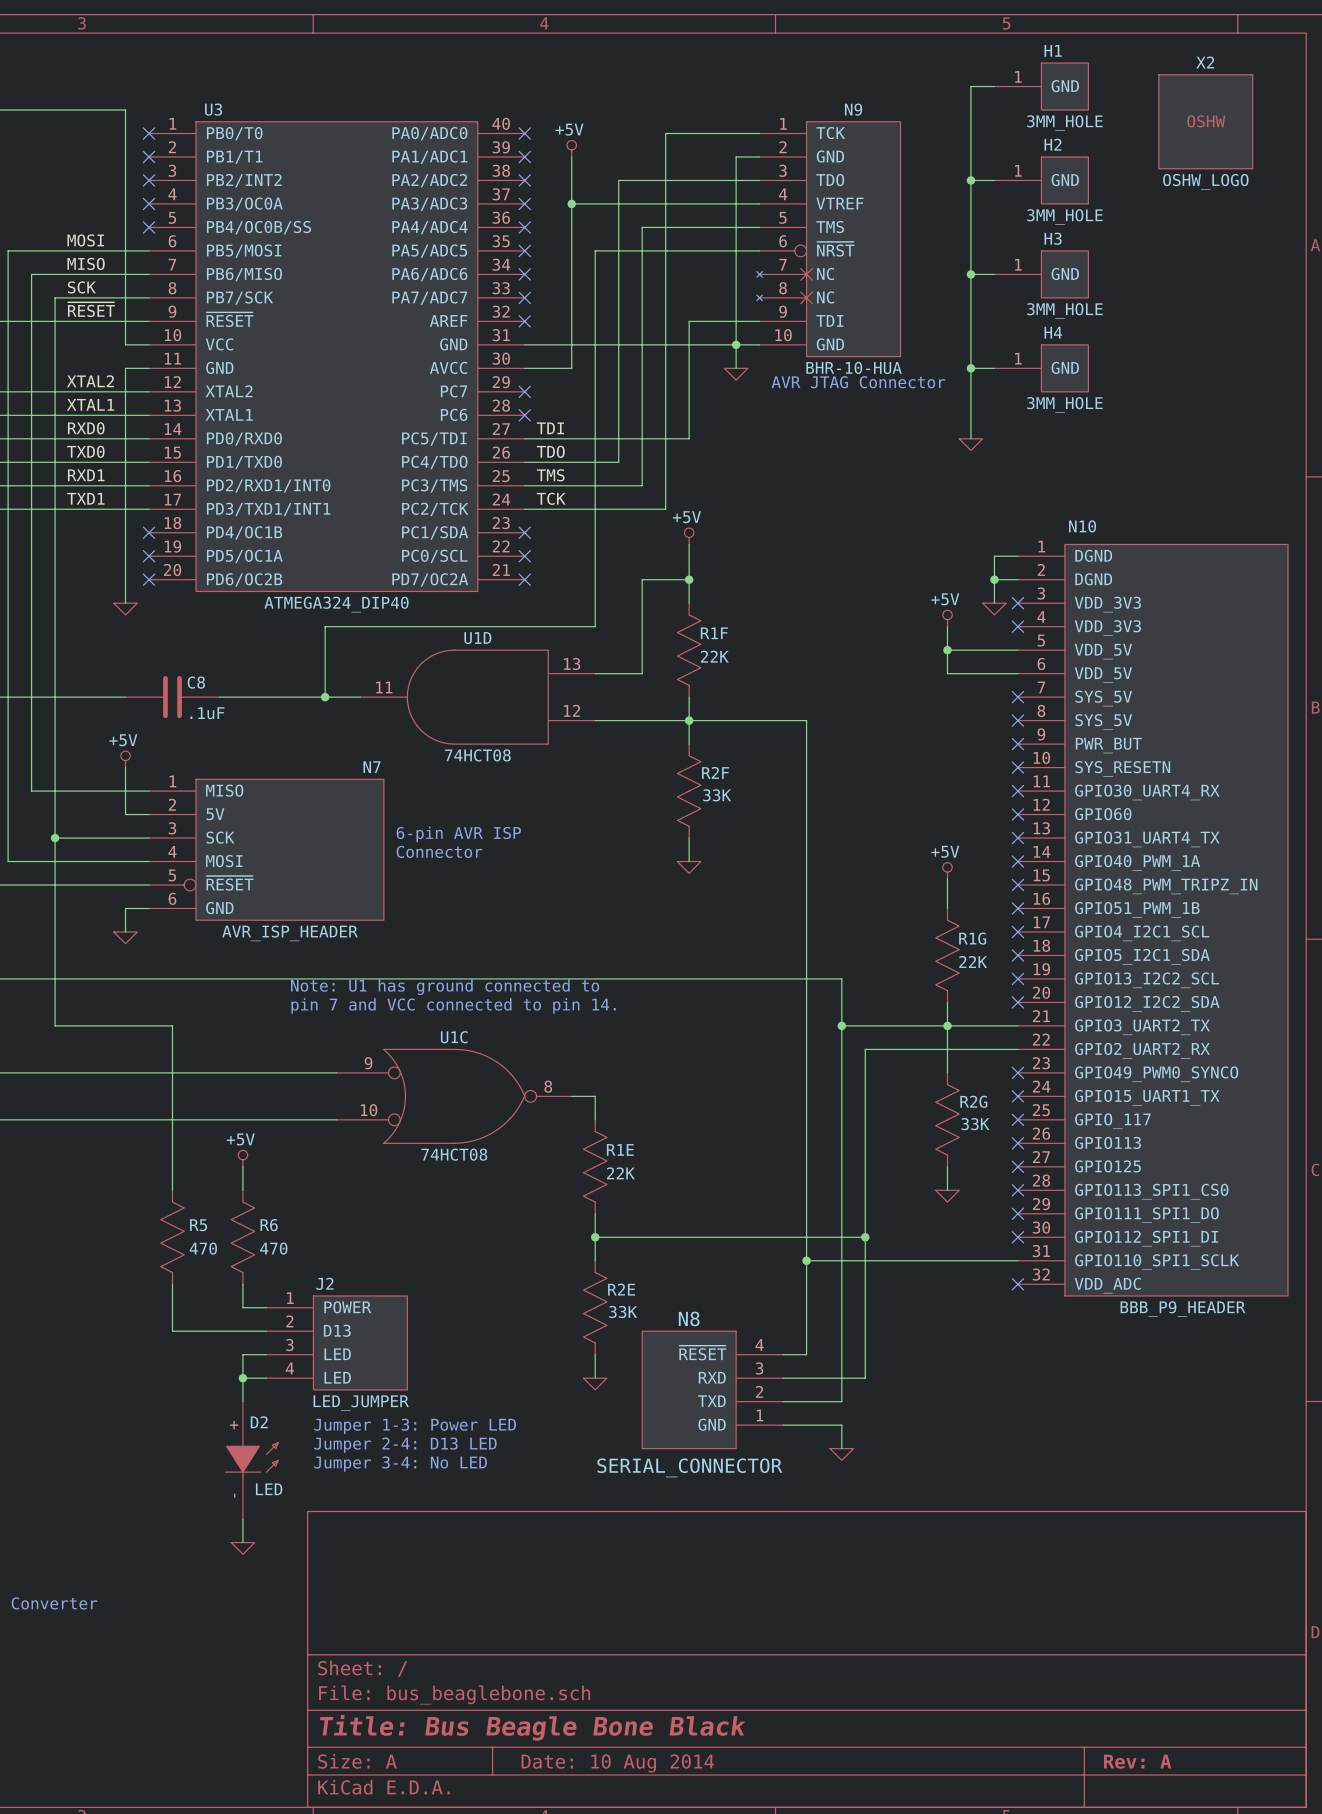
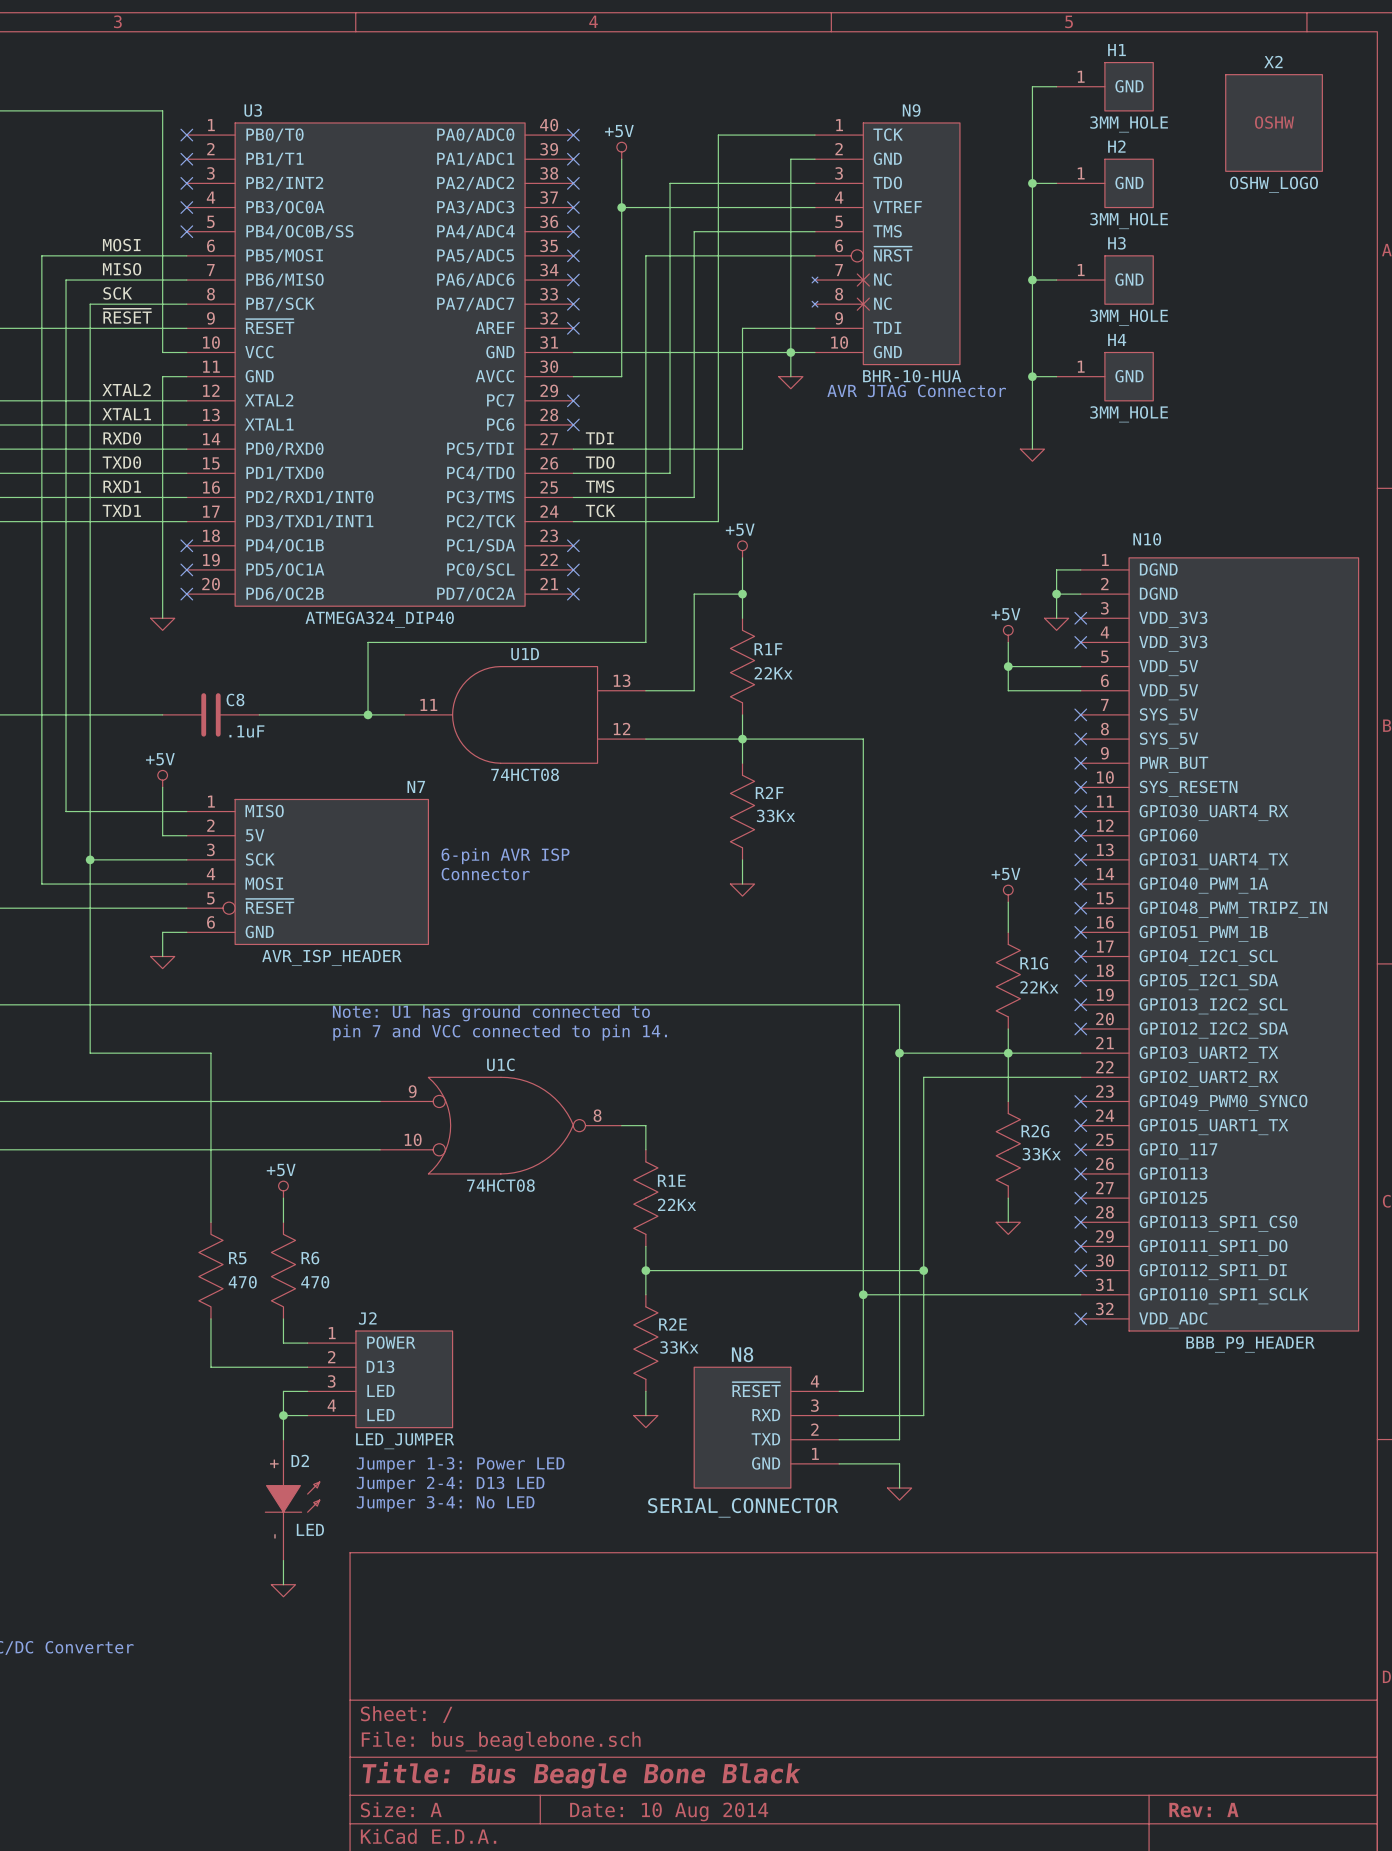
R1F value: 22K (714, 656) -> 22Kx (773, 673)
R2F value: 33K (717, 795) -> 33Kx (775, 815)
R1G value: 22K (973, 961) -> 22Kx (1039, 987)
R2G value: 33K (975, 1124) -> 33Kx (1041, 1154)
R1E value: 22K (620, 1173) -> 22Kx (677, 1204)
R2E value: 33K (623, 1311) -> 33Kx (679, 1347)

